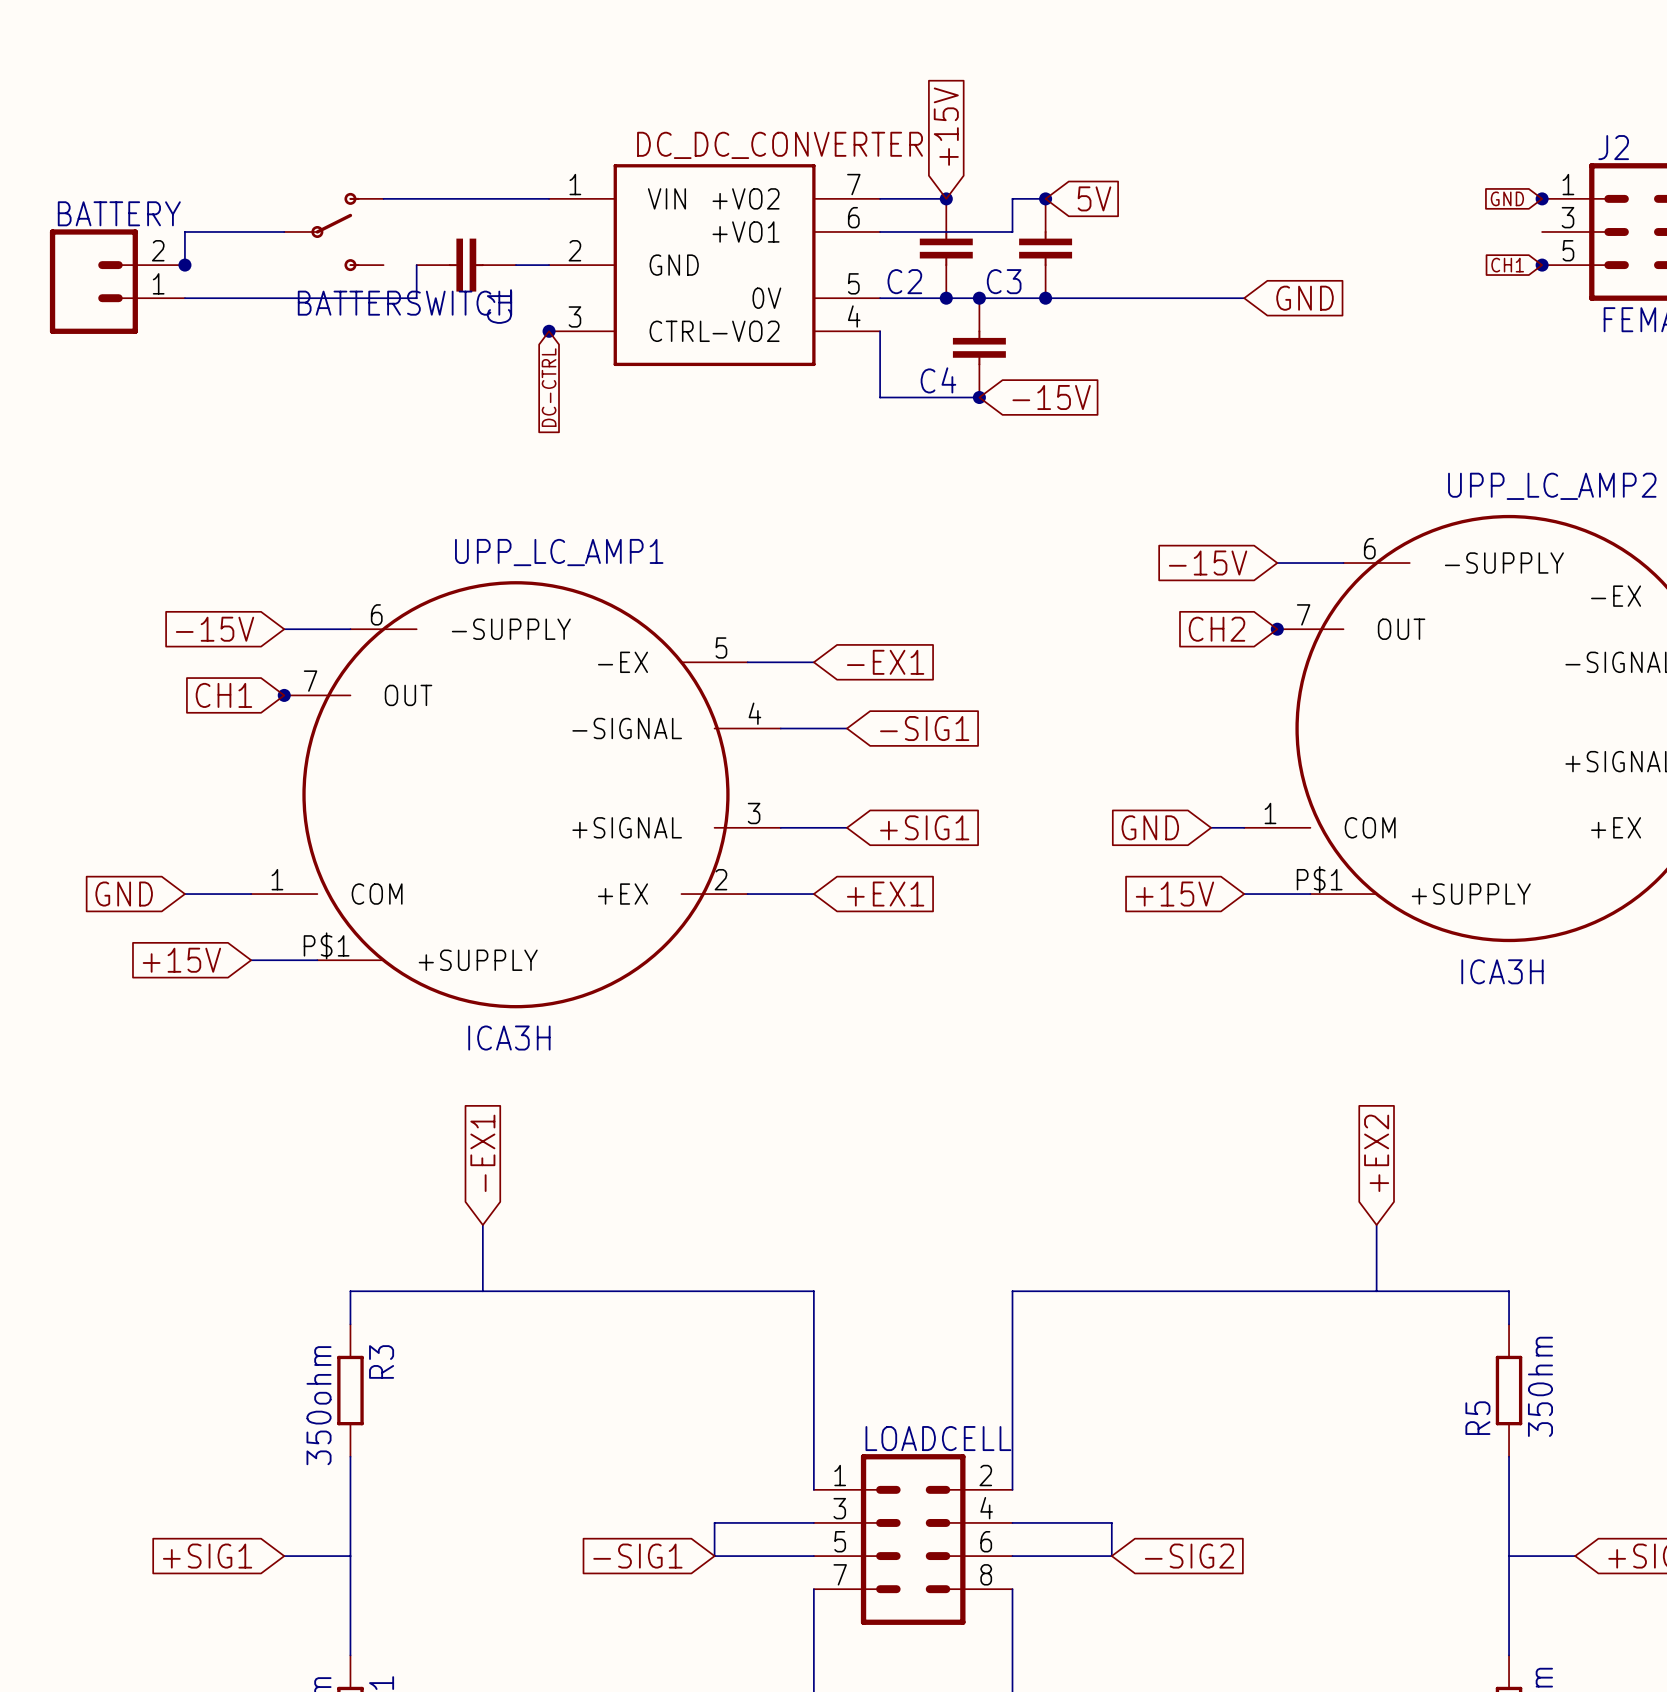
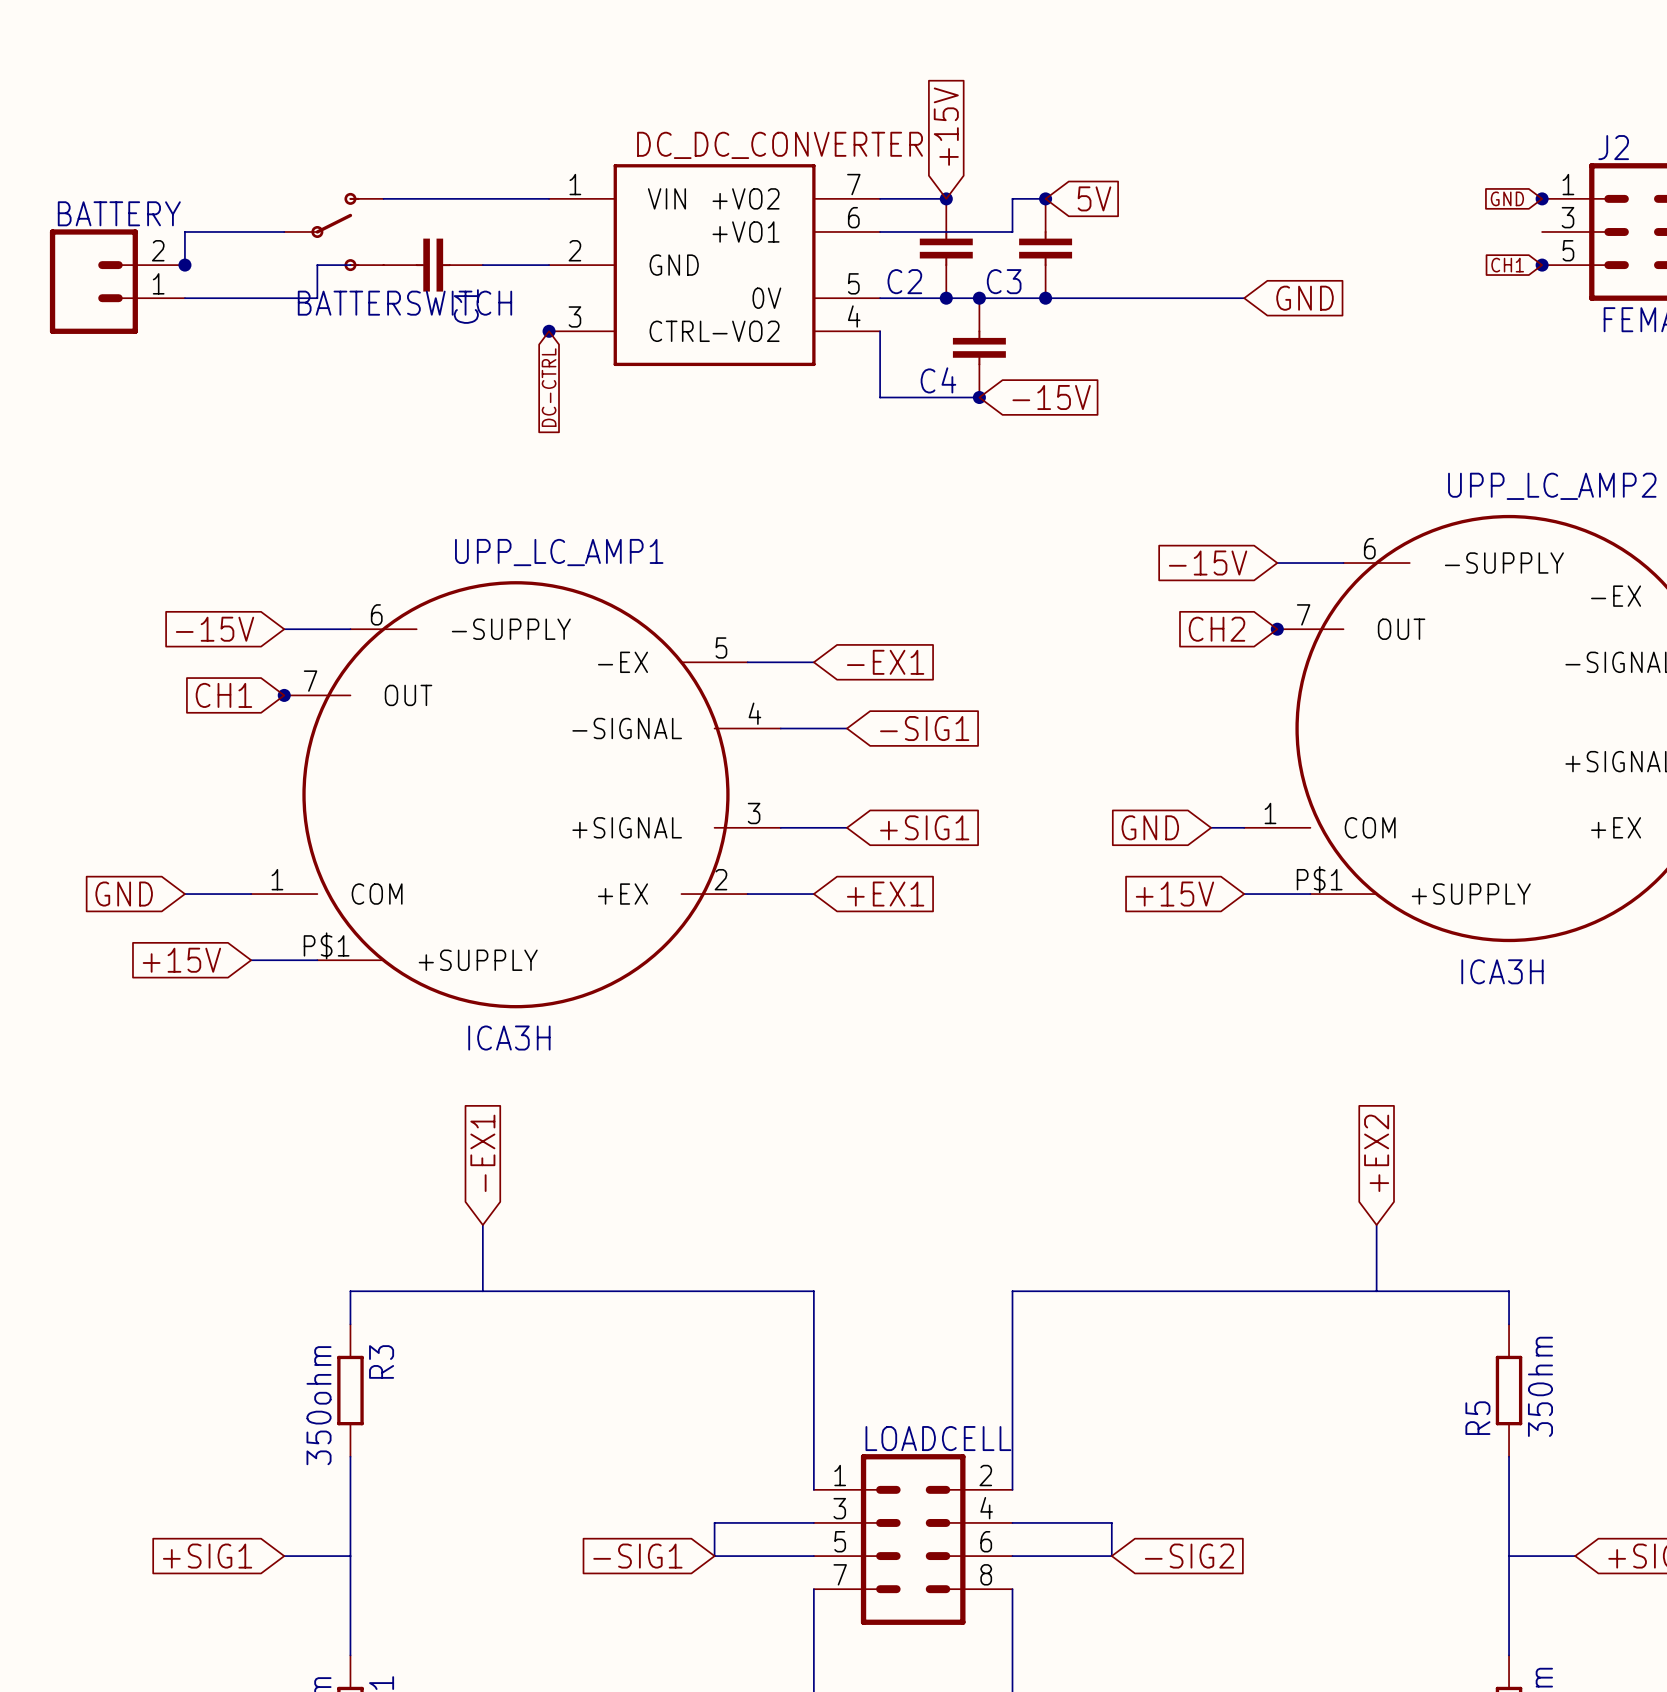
wire: (416, 265) (416, 298) (317, 298) -> (350, 265) (317, 265) (317, 298)
C1 position: (466, 265) -> (433, 265)

